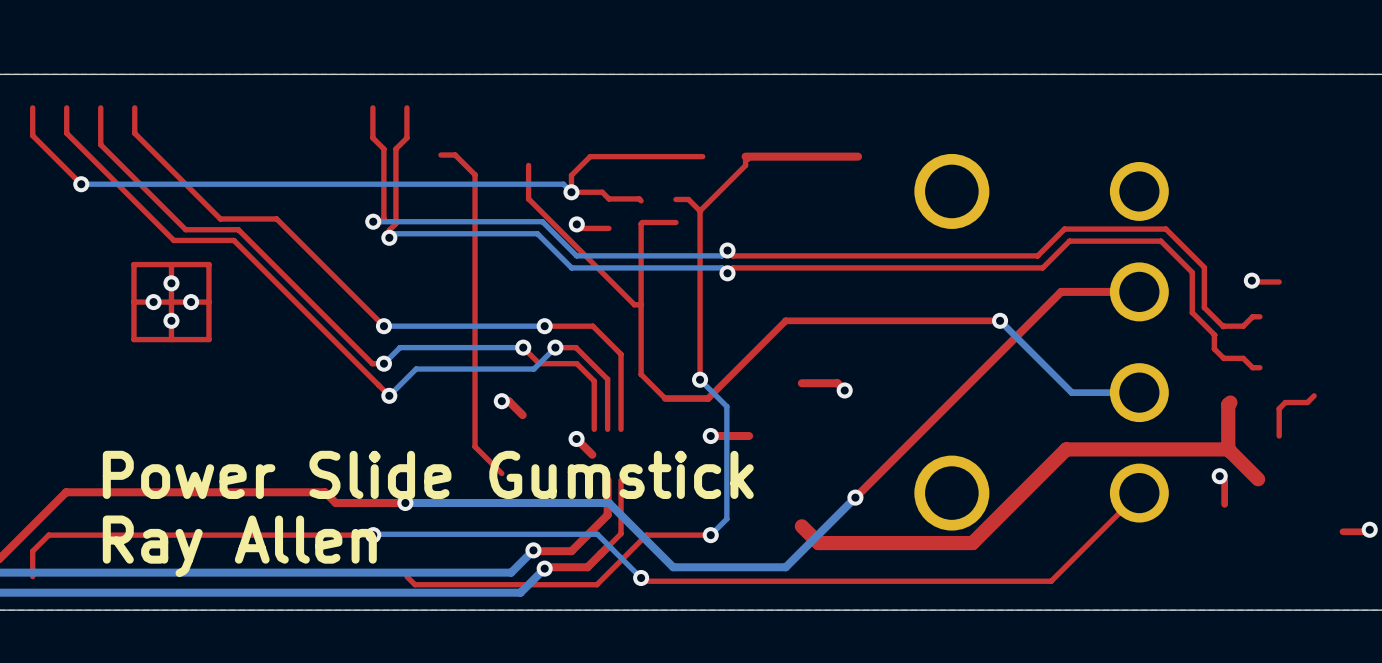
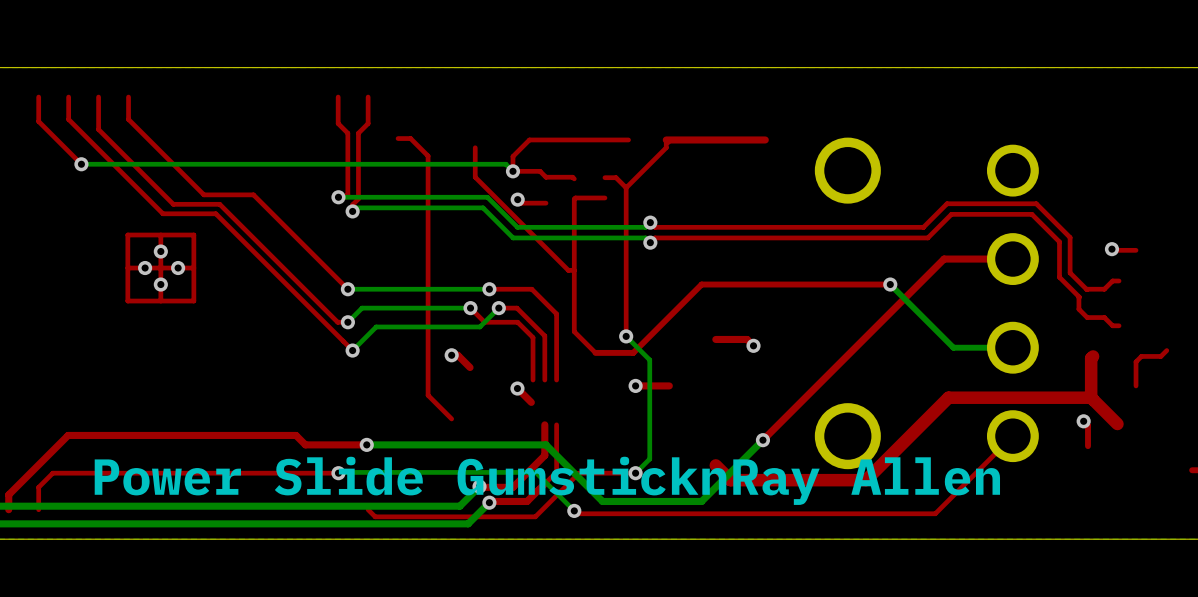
text: Power Slide Gumstick (428, 474) -> none
text: Ray Allen (239, 546) -> Power Slide GumsticknRay Allen (547, 480)

